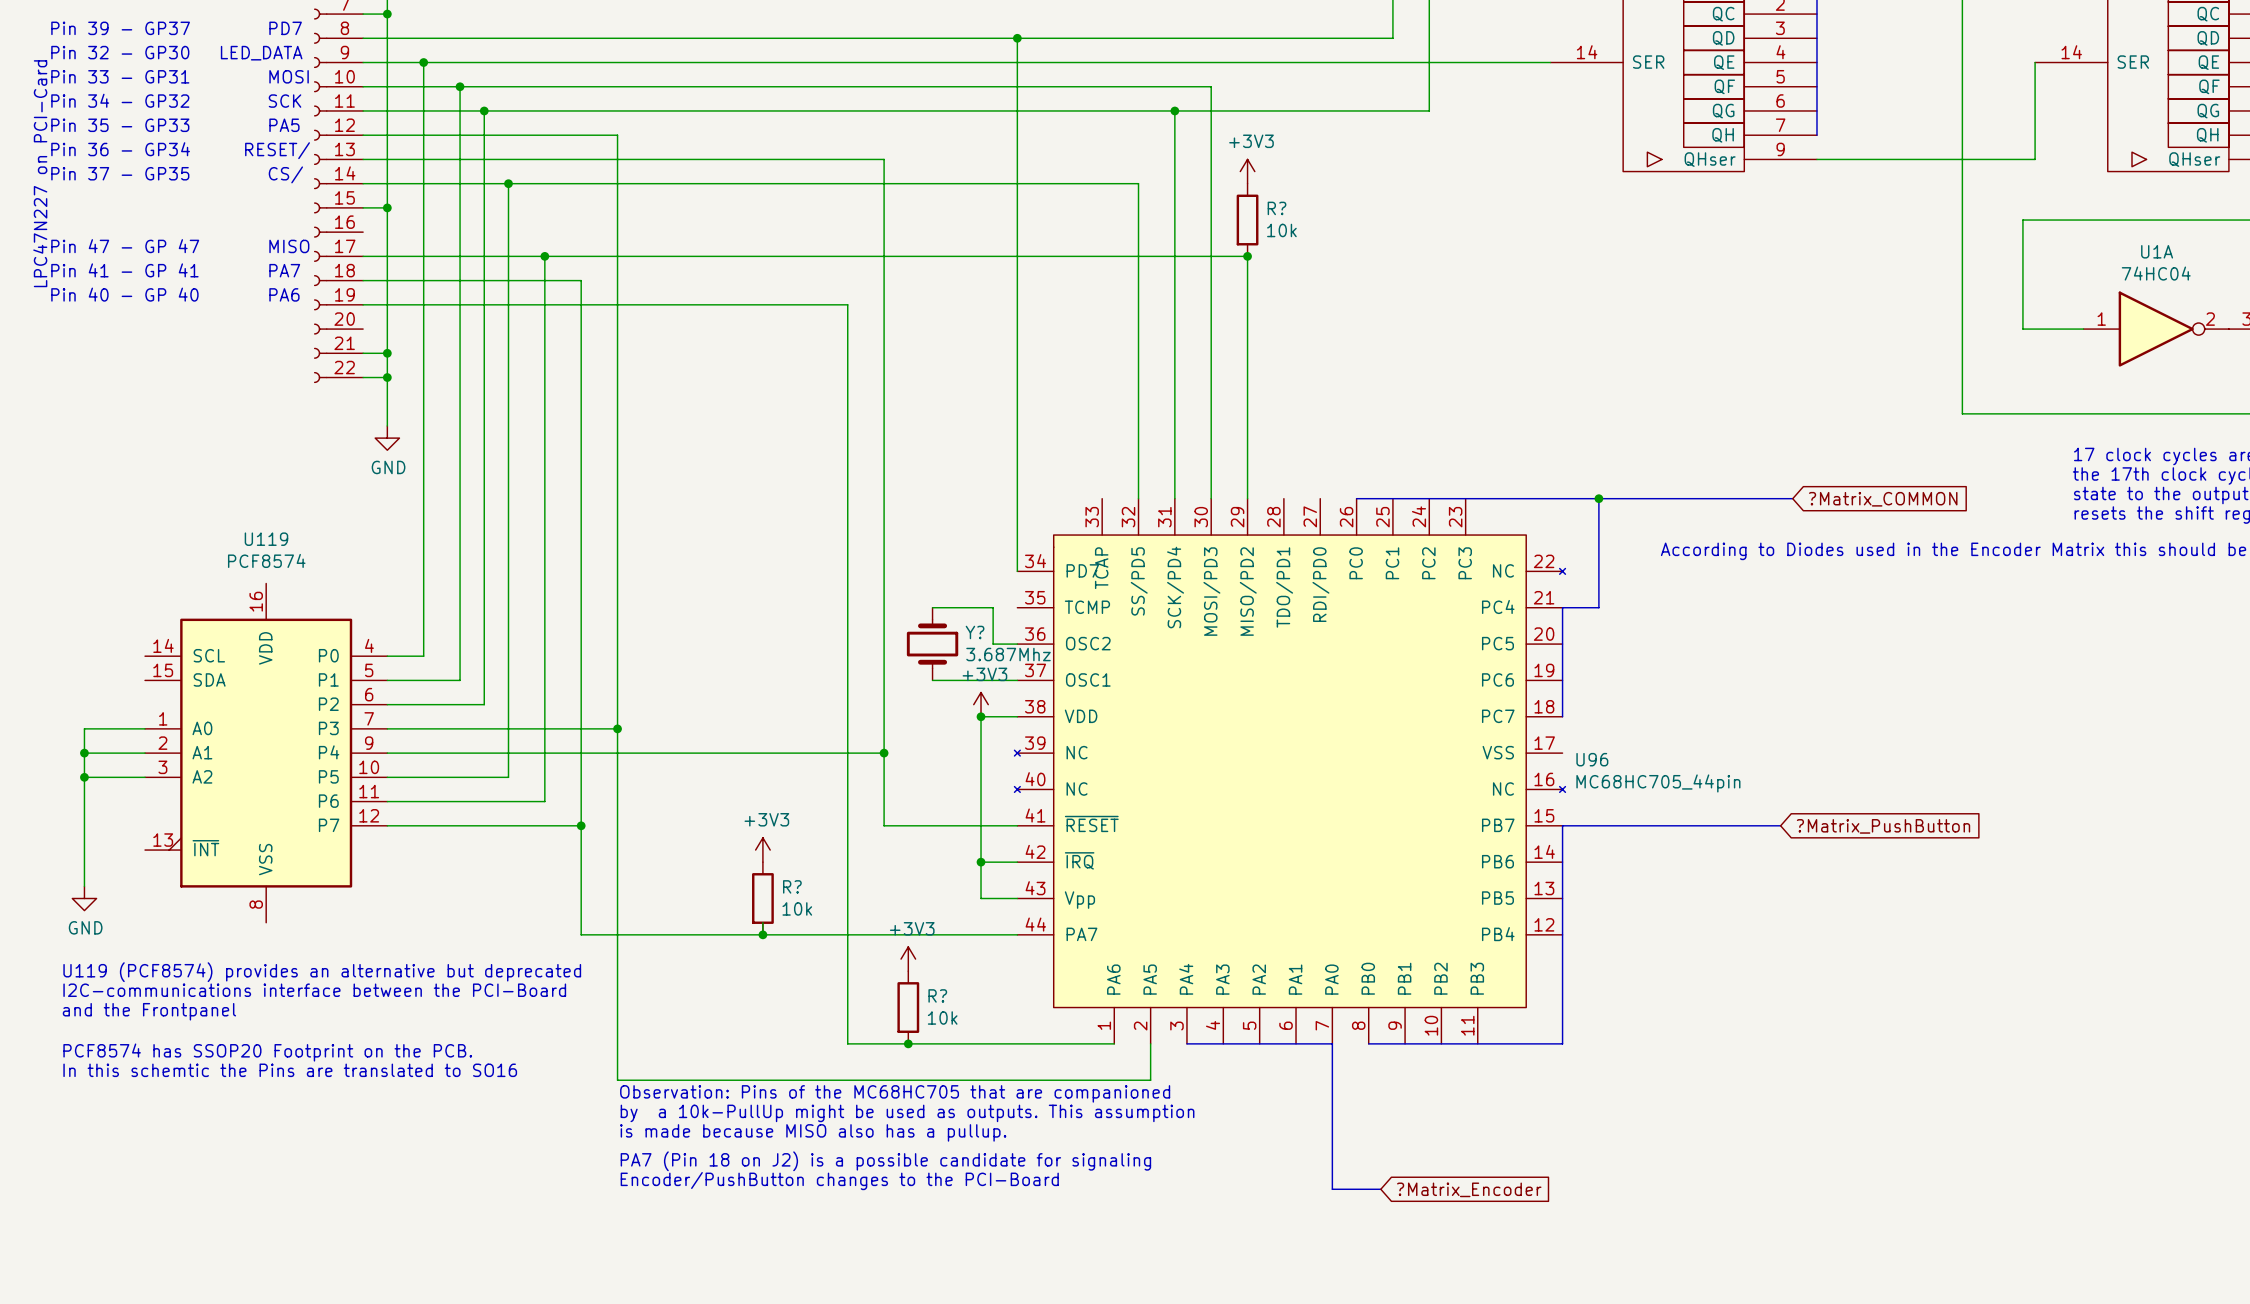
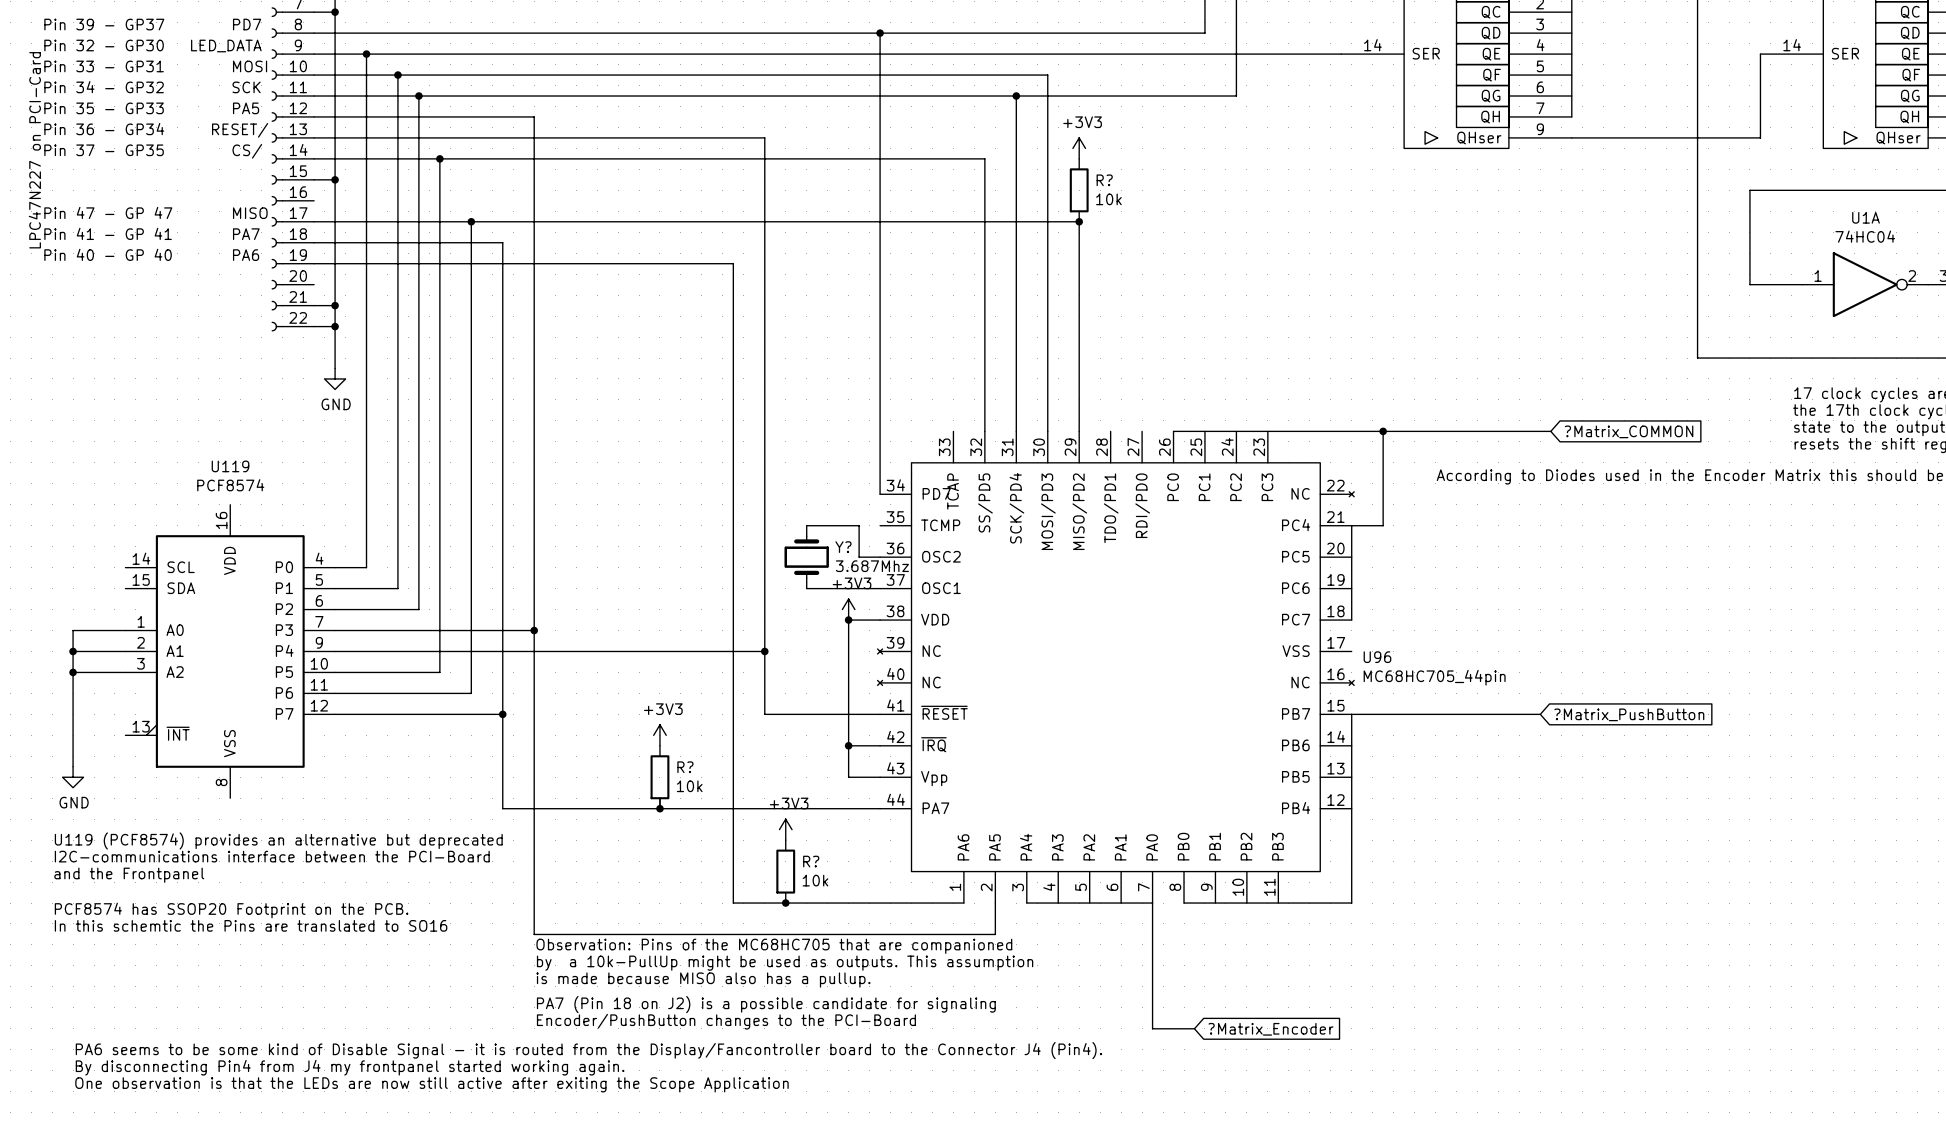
text: none -> PA6 seems to be some kind of Disable Signal - it is routed from the Display/Fancontroller board to the Connector J4 (Pin4). (588, 1050)
text: none -> By disconnecting Pin4 from J4 my frontpanel started working again. (350, 1067)
text: none -> One observation is that the LEDs are now still active after exiting the Scope Application (431, 1084)

